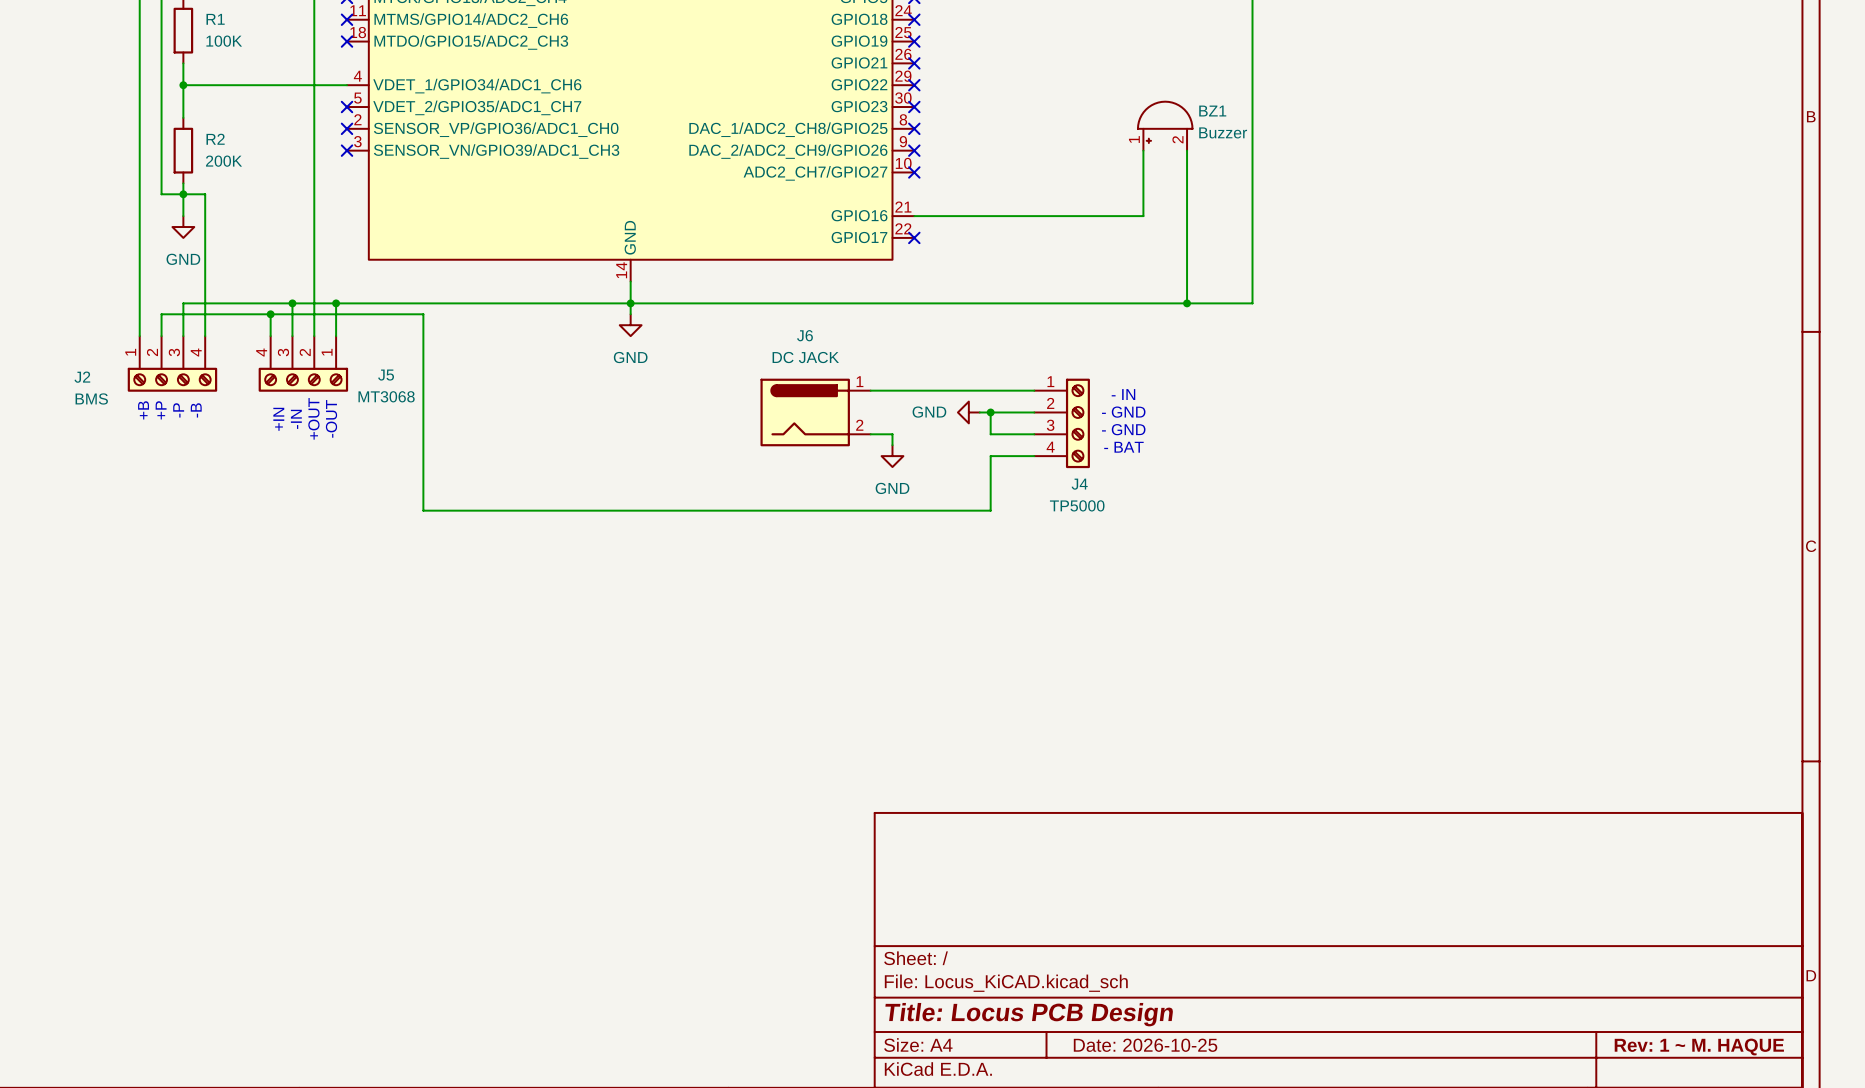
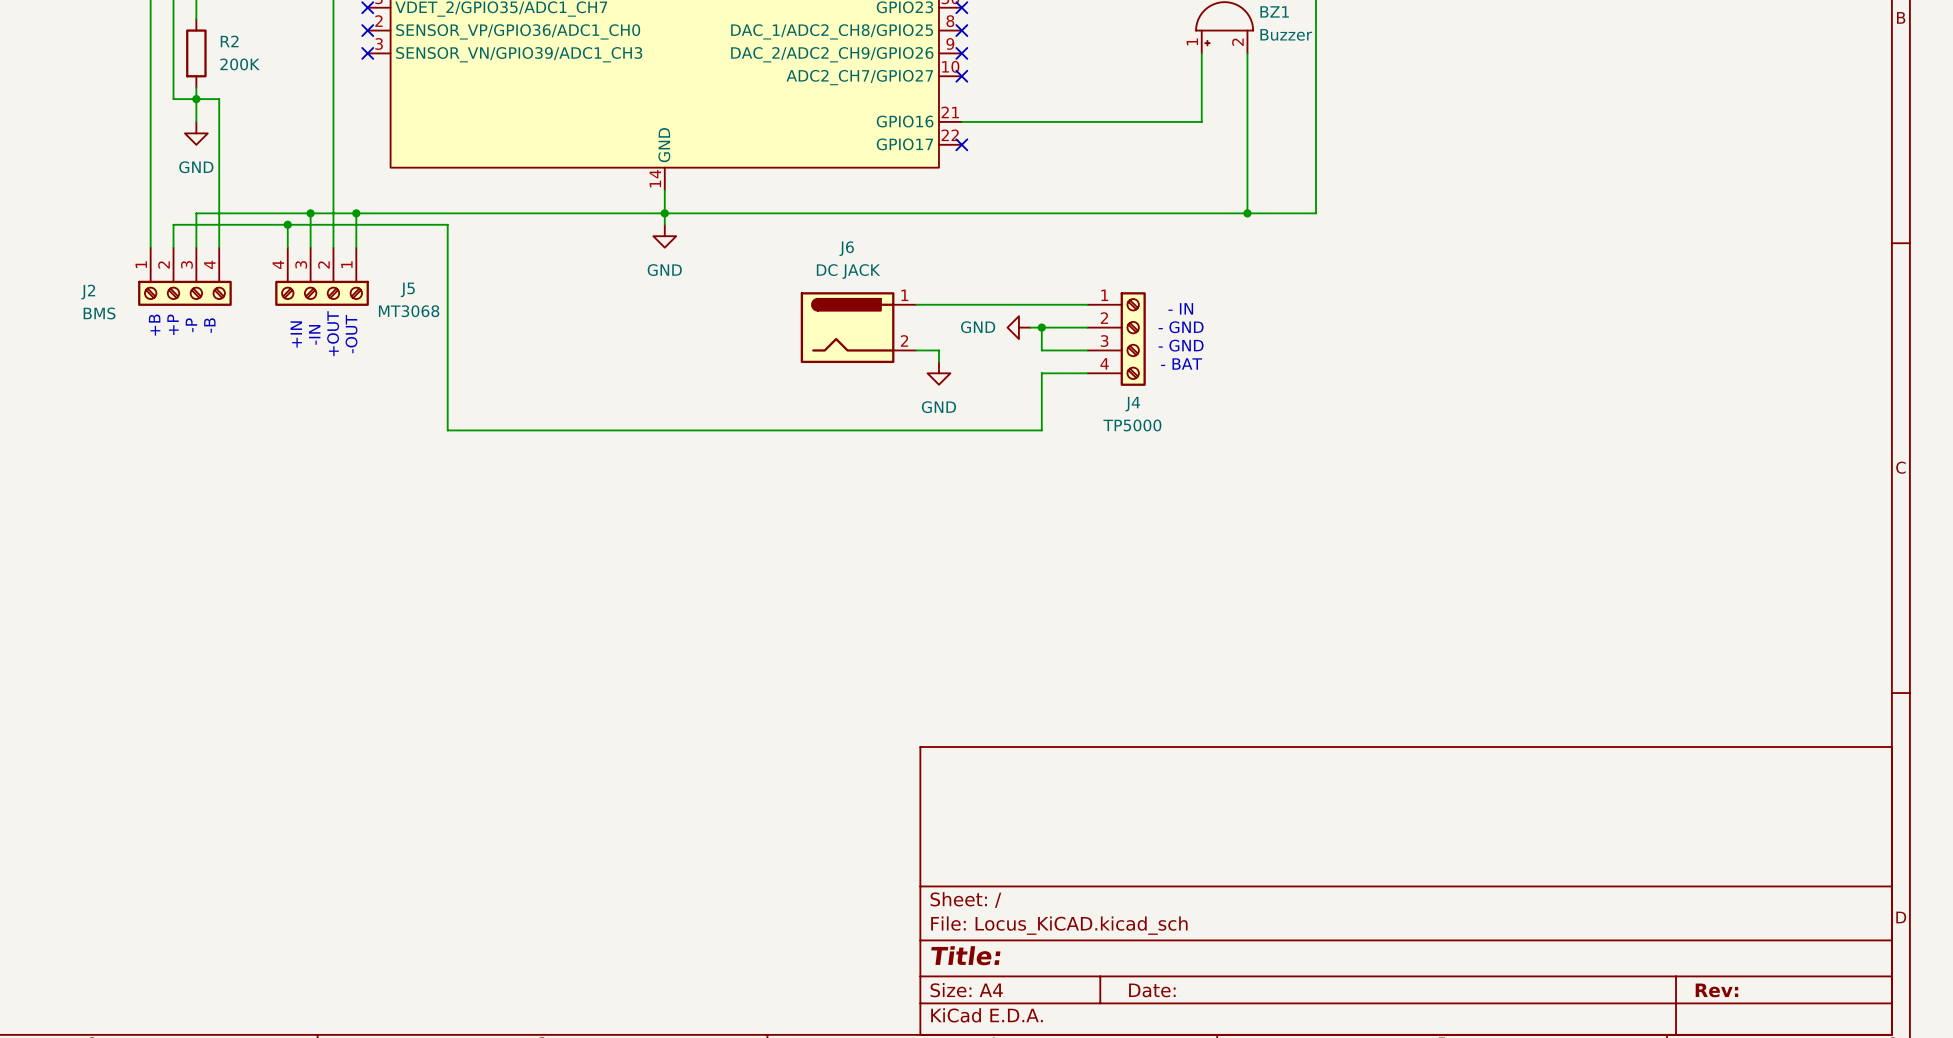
title block: Title: Locus PCB Design (1029, 1014) -> Title: (965, 955)
title block: Date: 2026-10-25 (1145, 1045) -> Date: (1152, 990)
title block: Rev: 1 ~ M. HAQUE (1699, 1047) -> Rev: (1716, 990)

